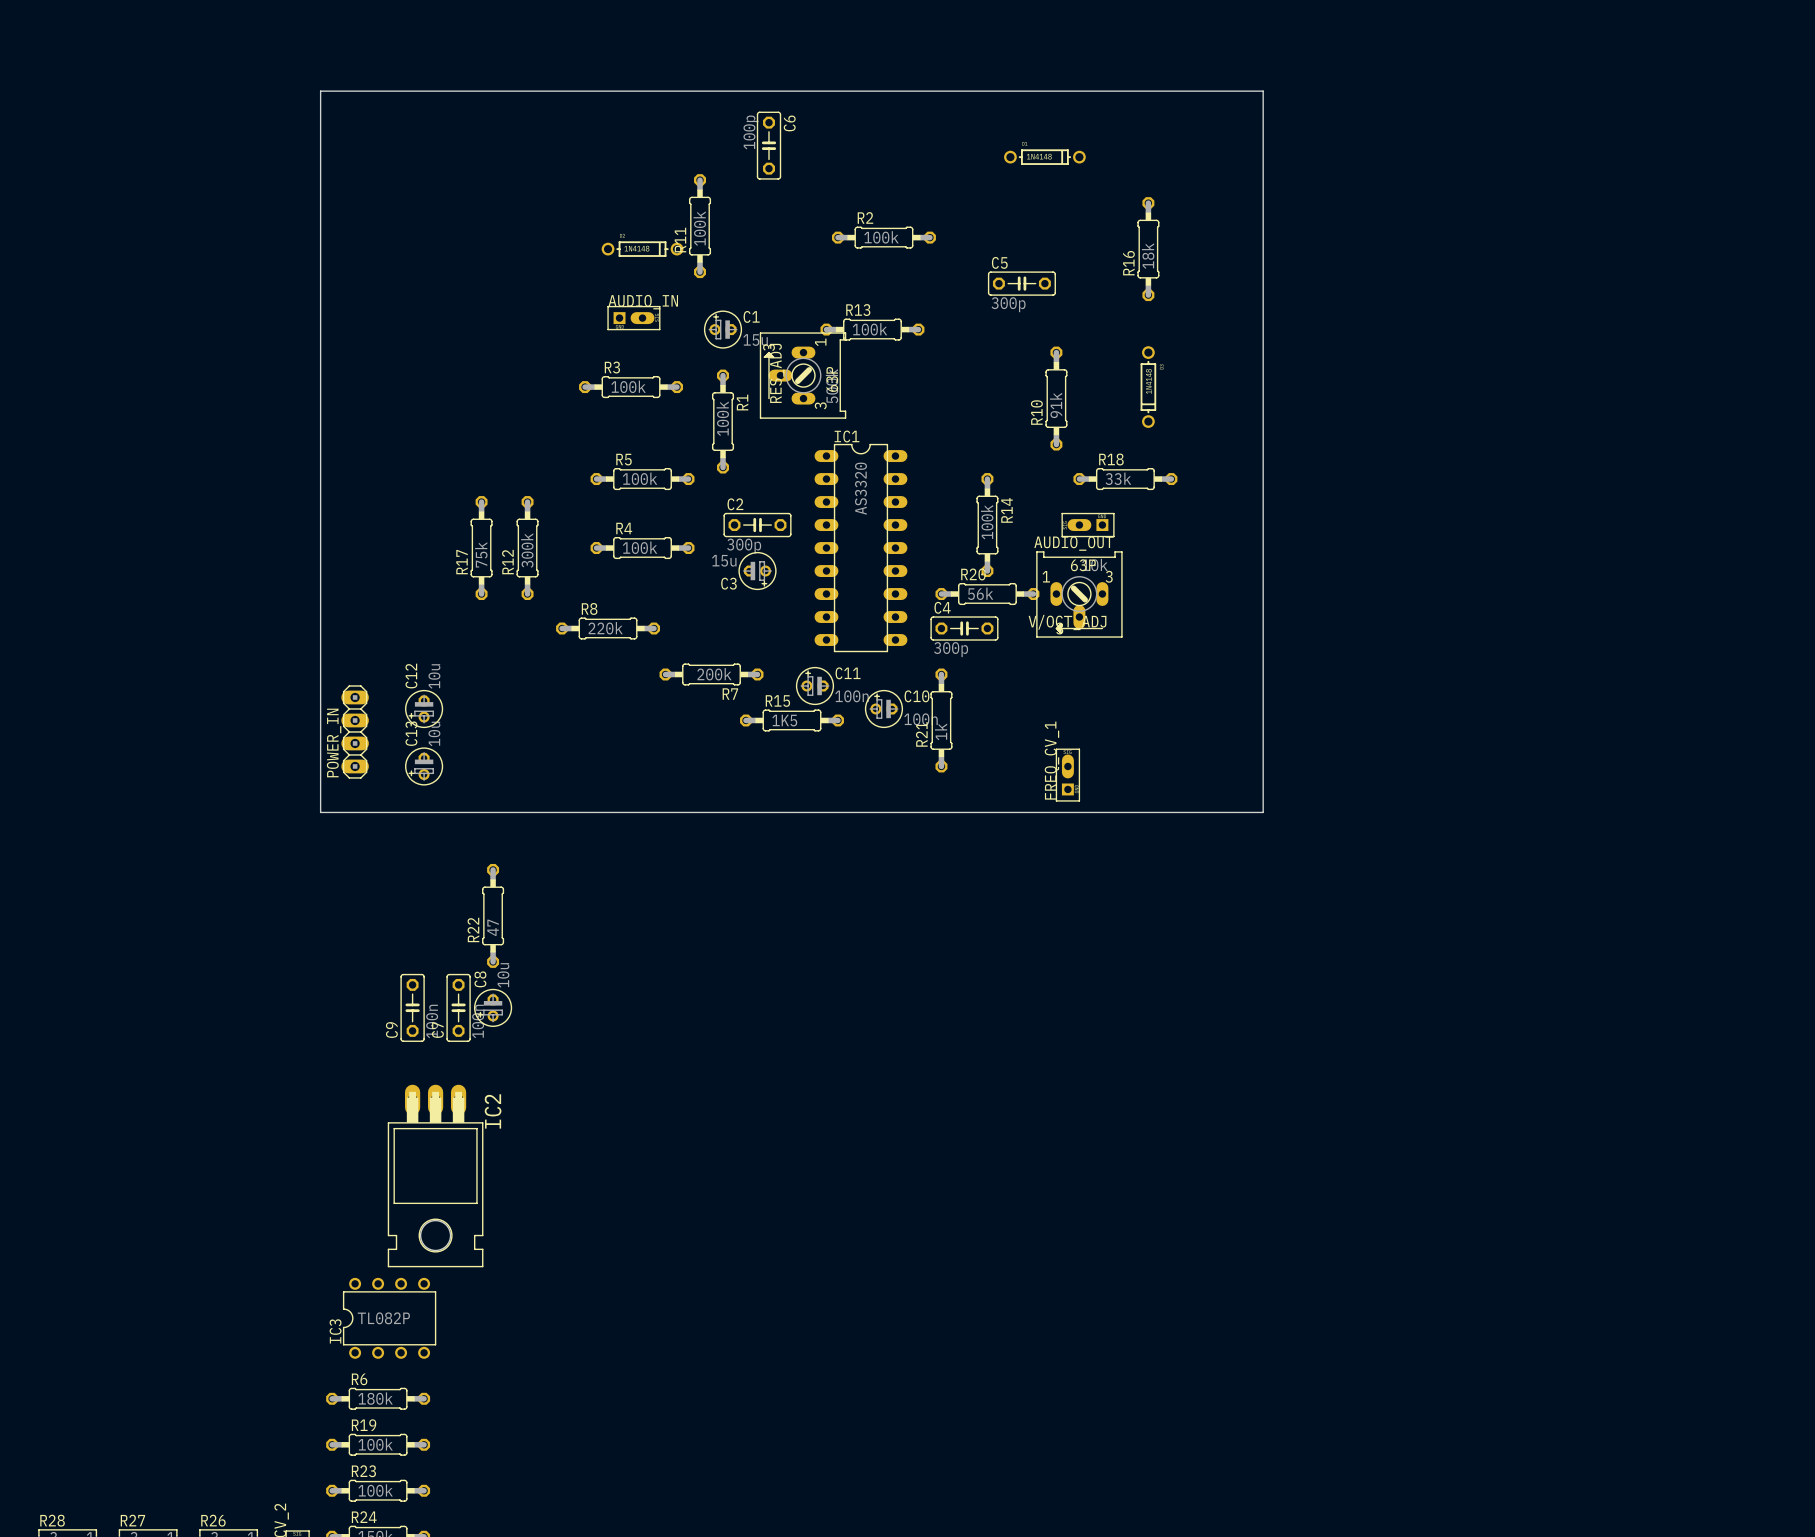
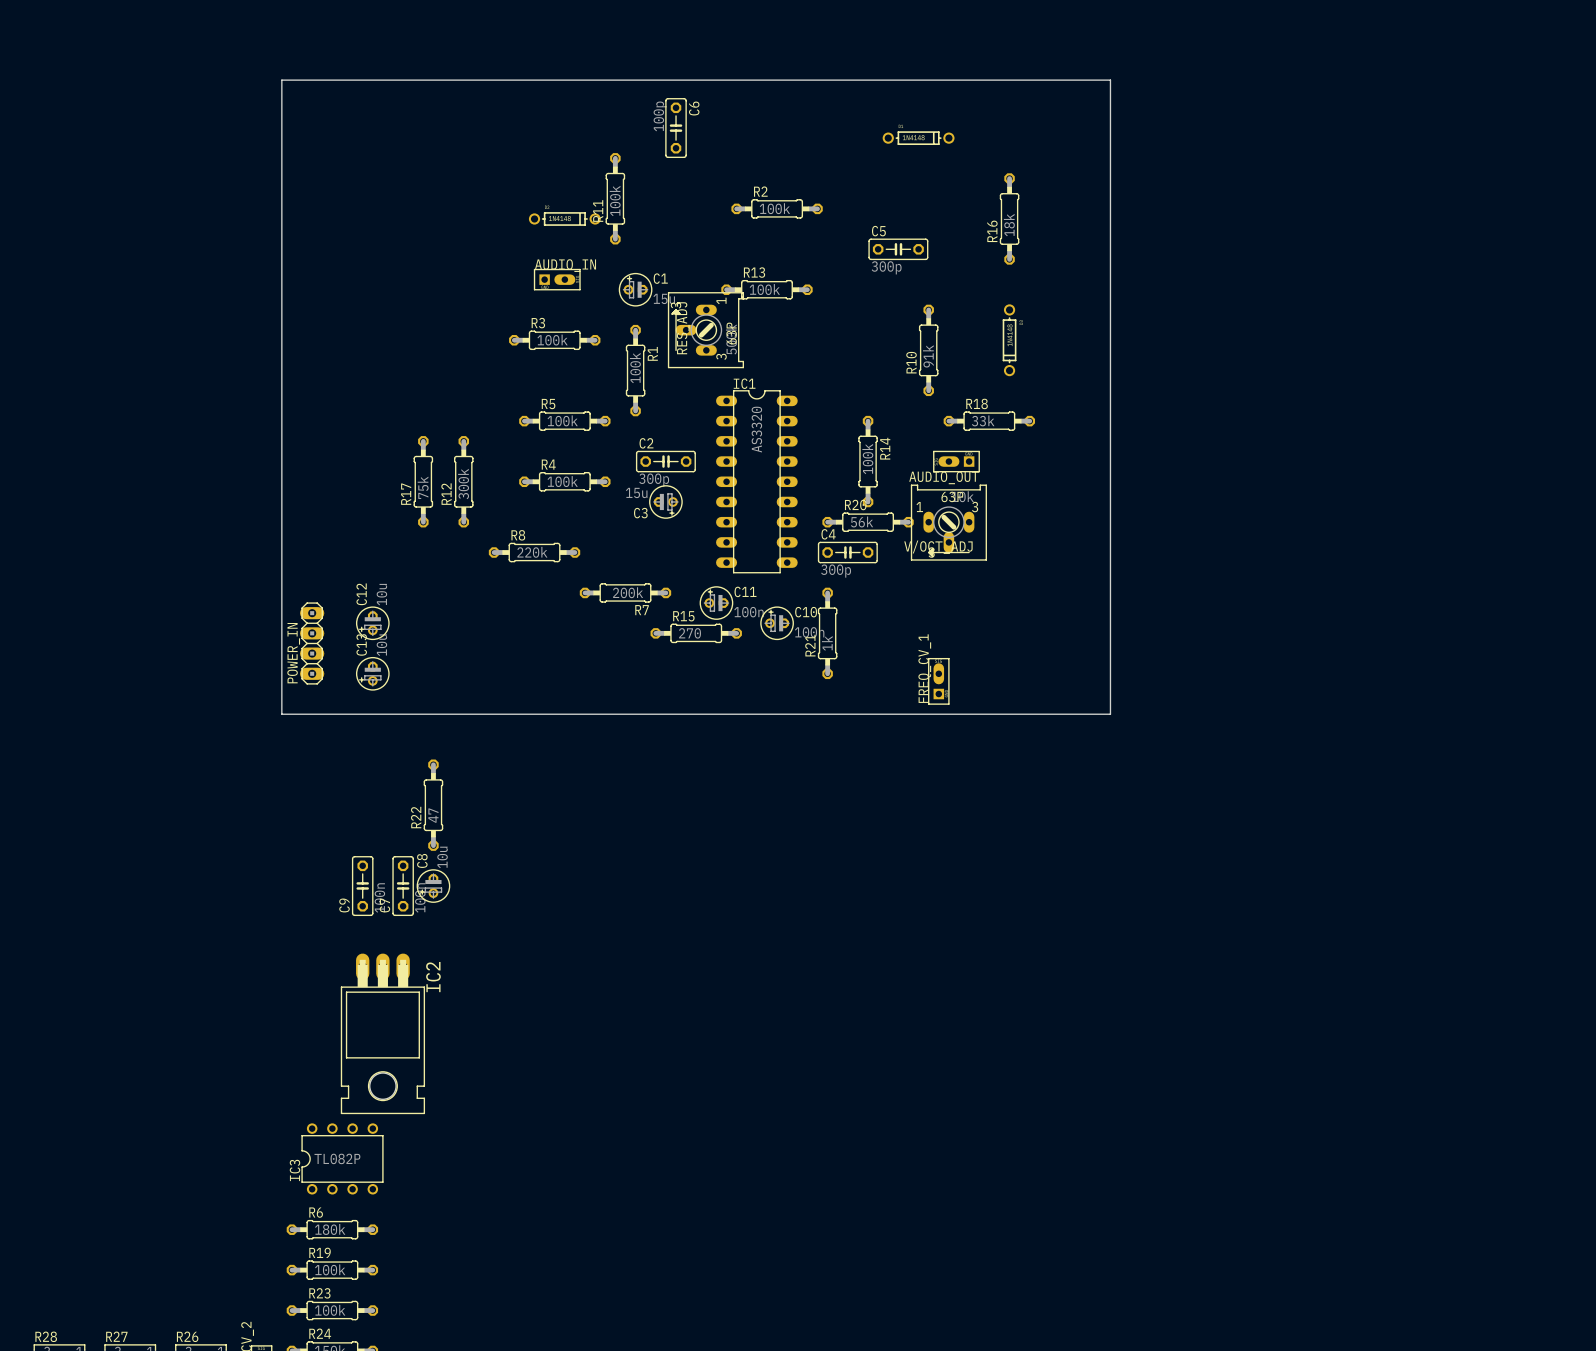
R15 value: 1K5 (784, 720) -> 270 (690, 633)

